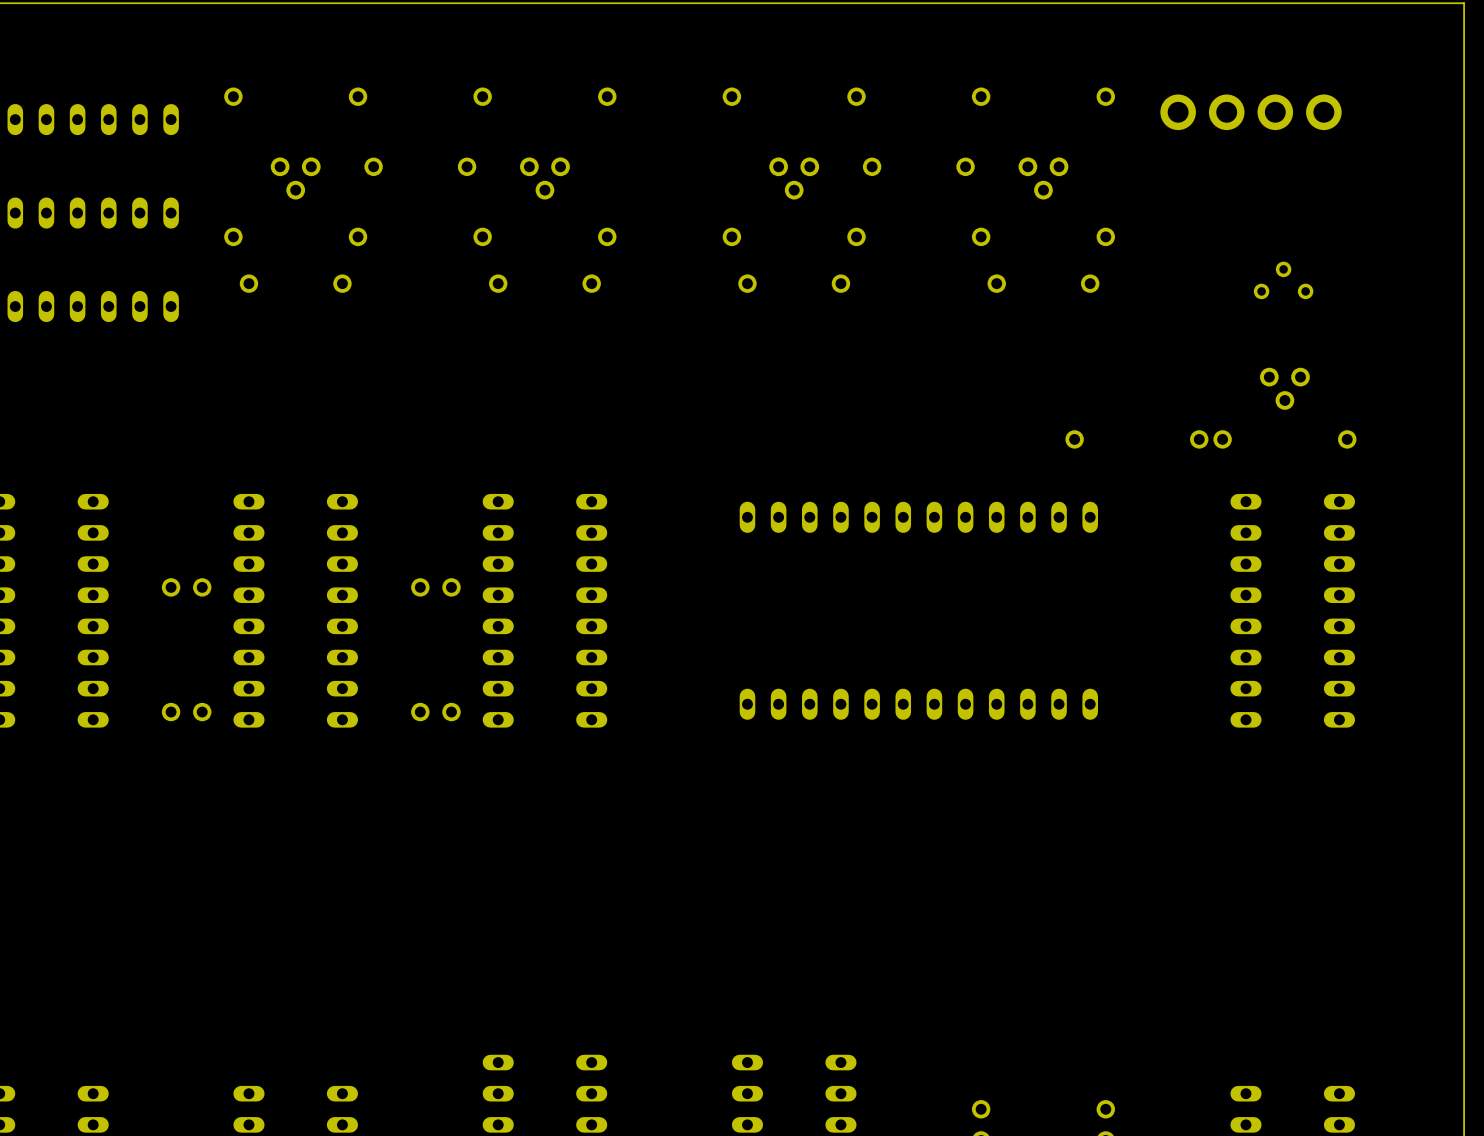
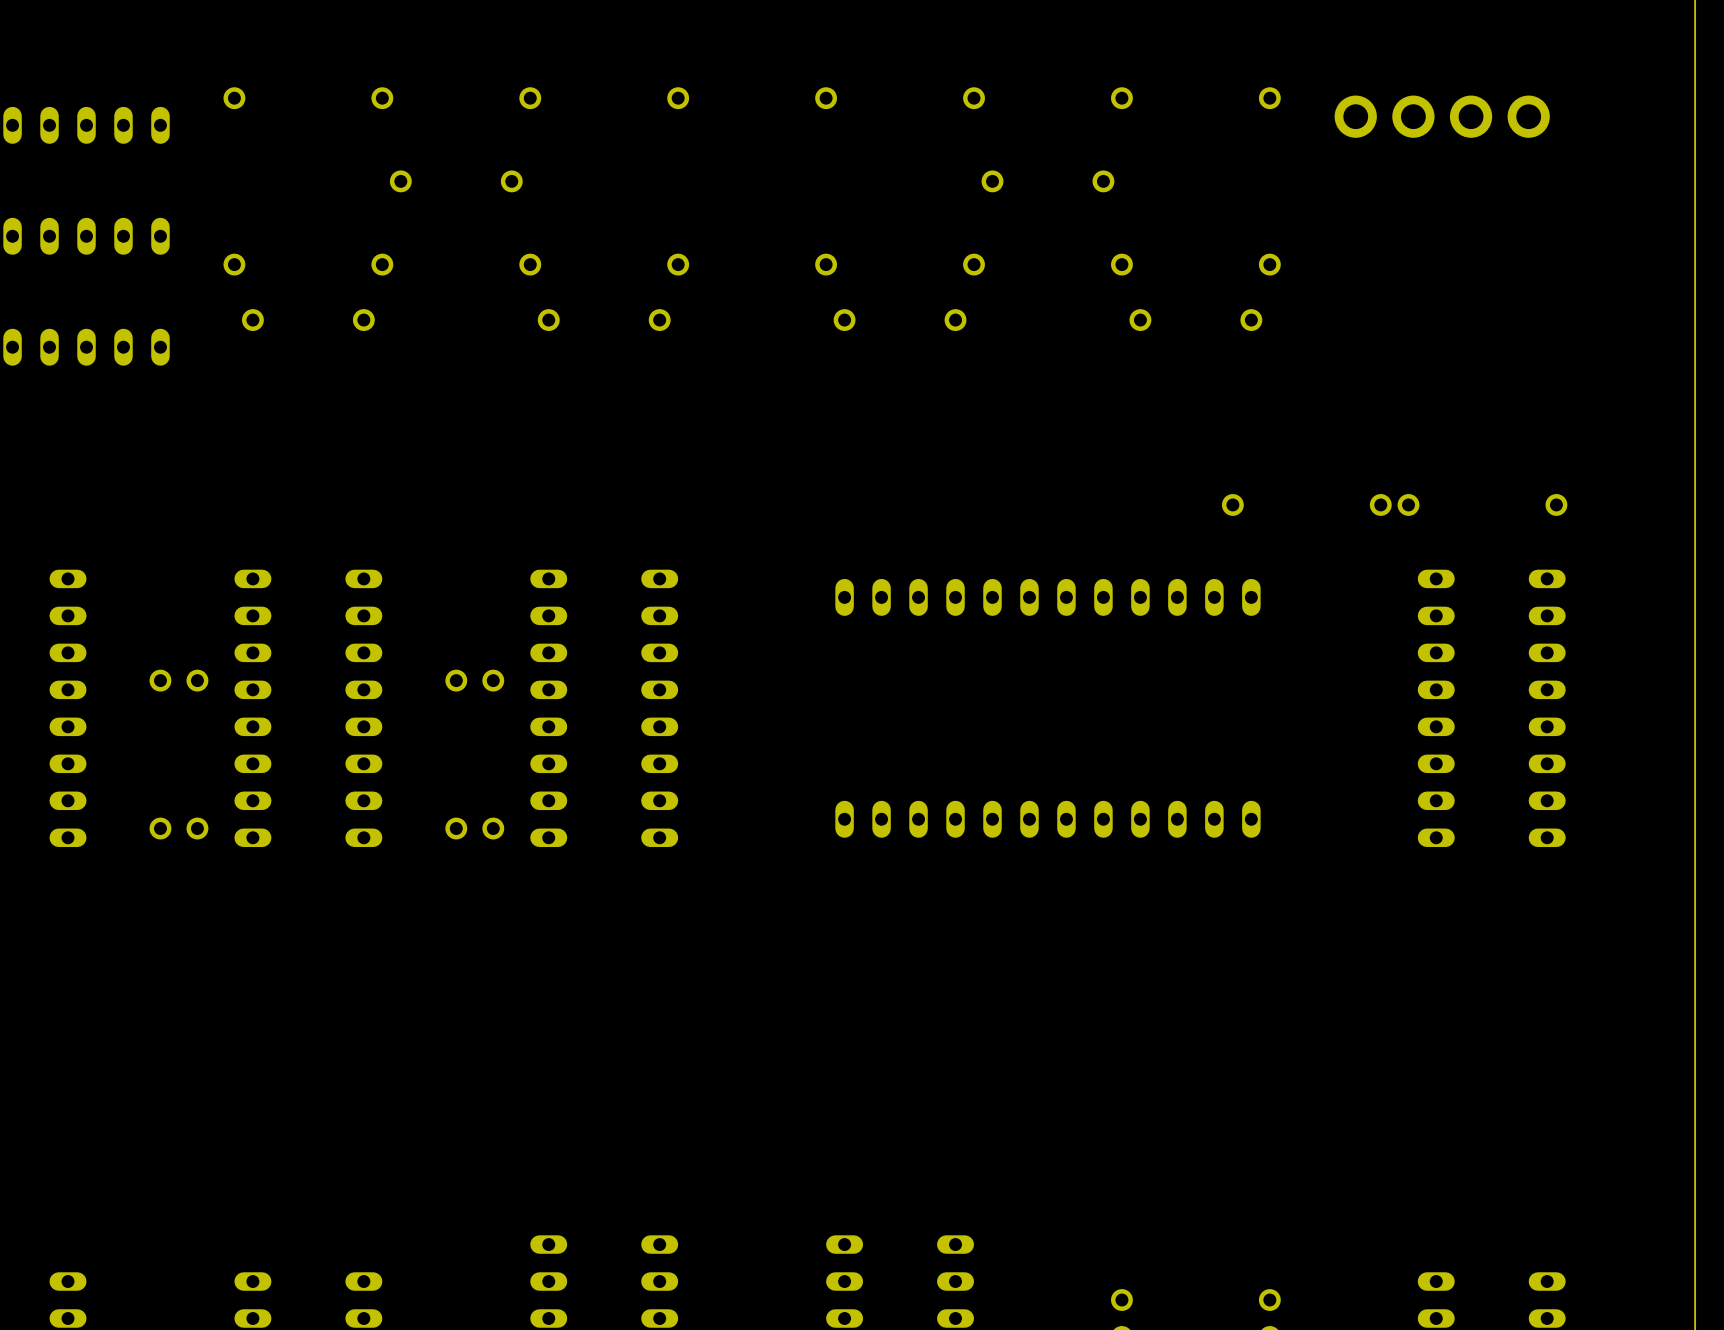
part: (295, 178) -> none
part: (544, 178) -> none
part: (794, 178) -> none
part: (1043, 178) -> none
part: (1283, 280) -> none
part: (1284, 388) -> none

